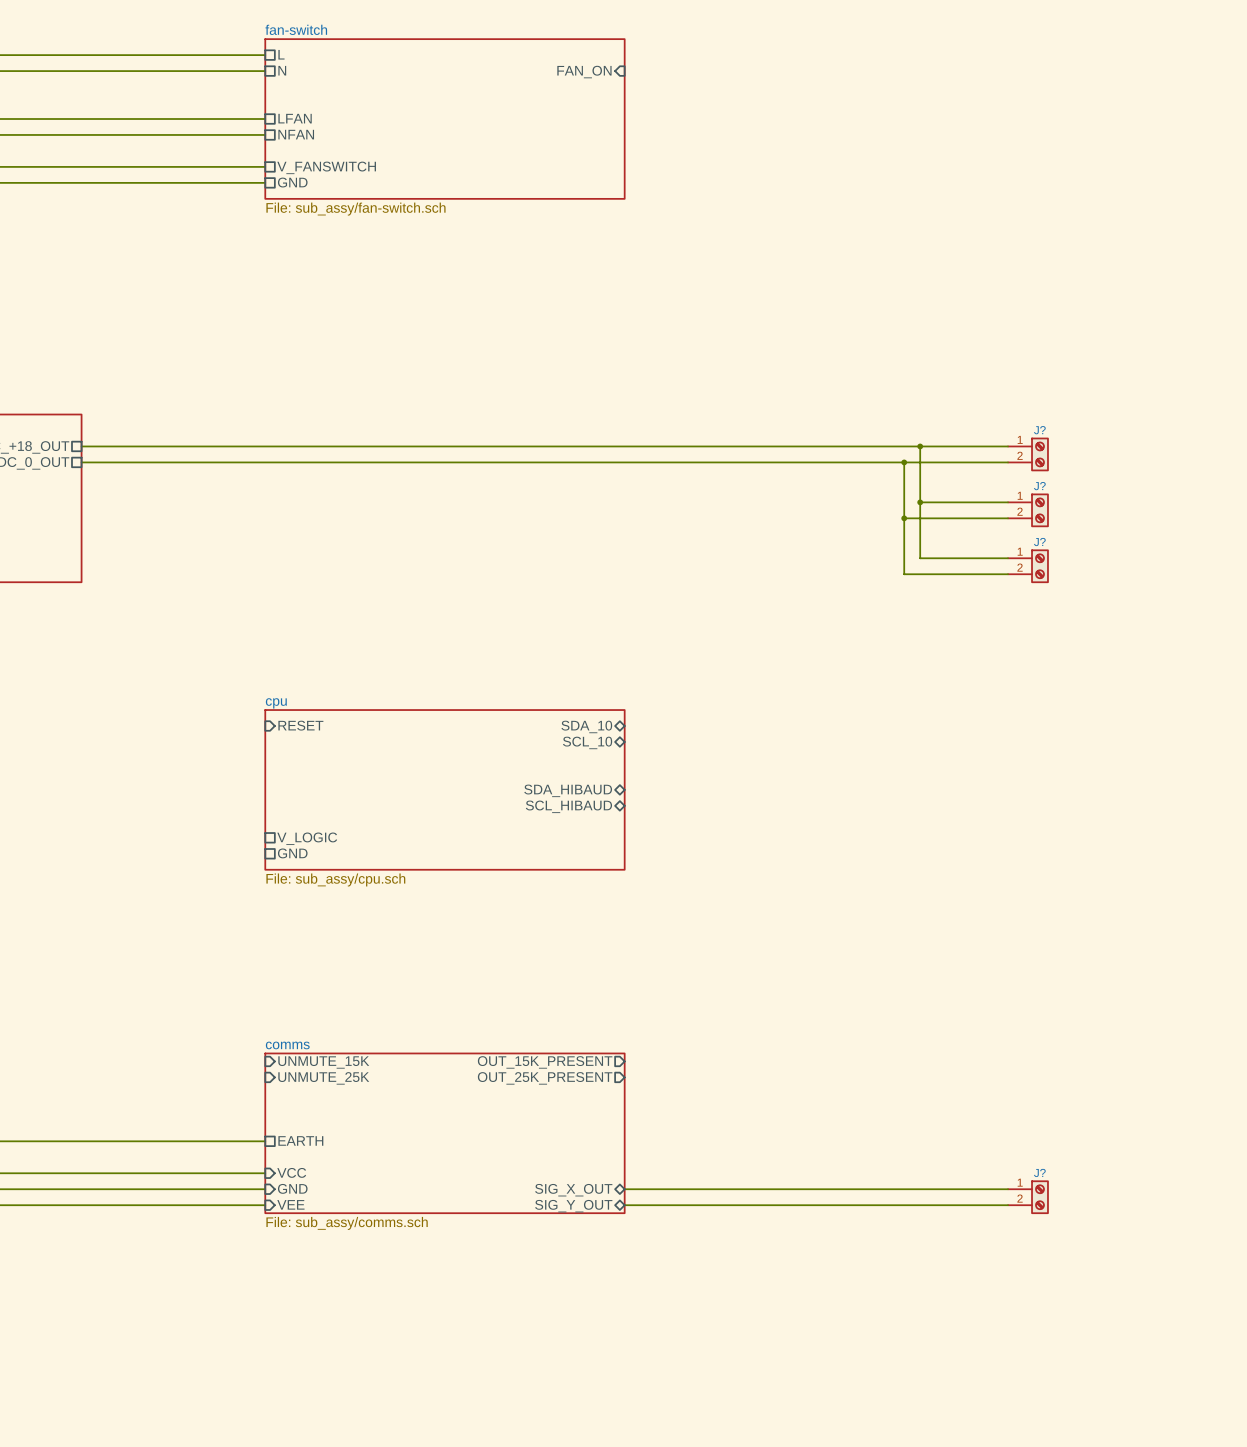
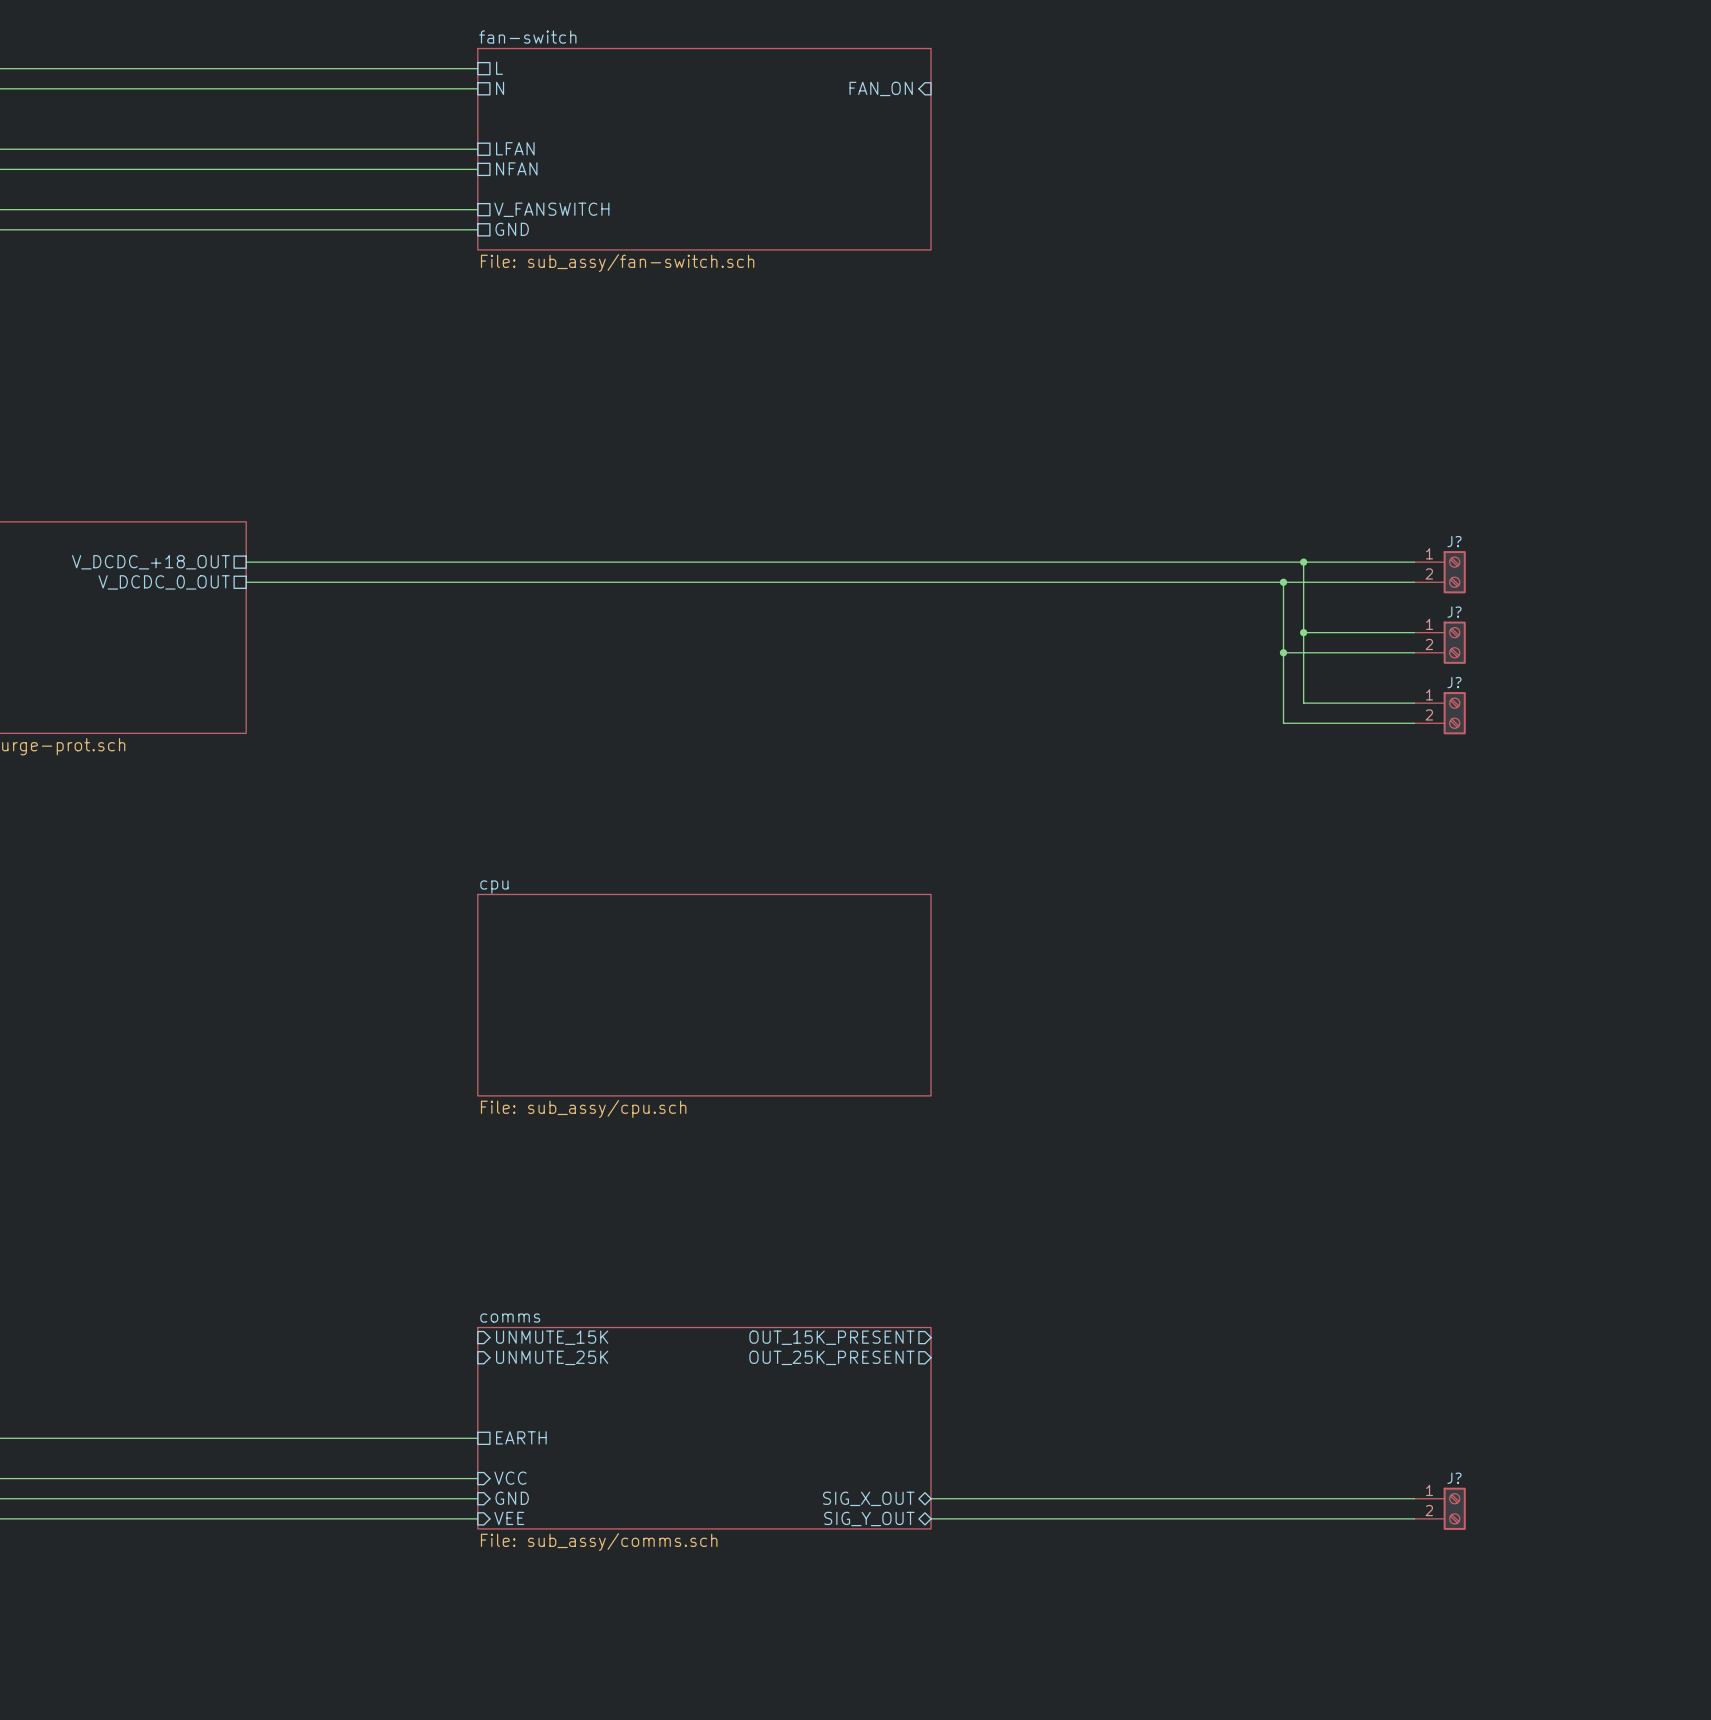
sheet pin: RESET (300, 725) -> none
sheet pin: SDA_10 (586, 726) -> none
sheet pin: SCL_10 (587, 742) -> none
sheet pin: SDA_HIBAUD (568, 790) -> none
sheet pin: SCL_HIBAUD (568, 806) -> none
sheet pin: V_LOGIC (307, 838) -> none
sheet pin: GND (292, 853) -> none

